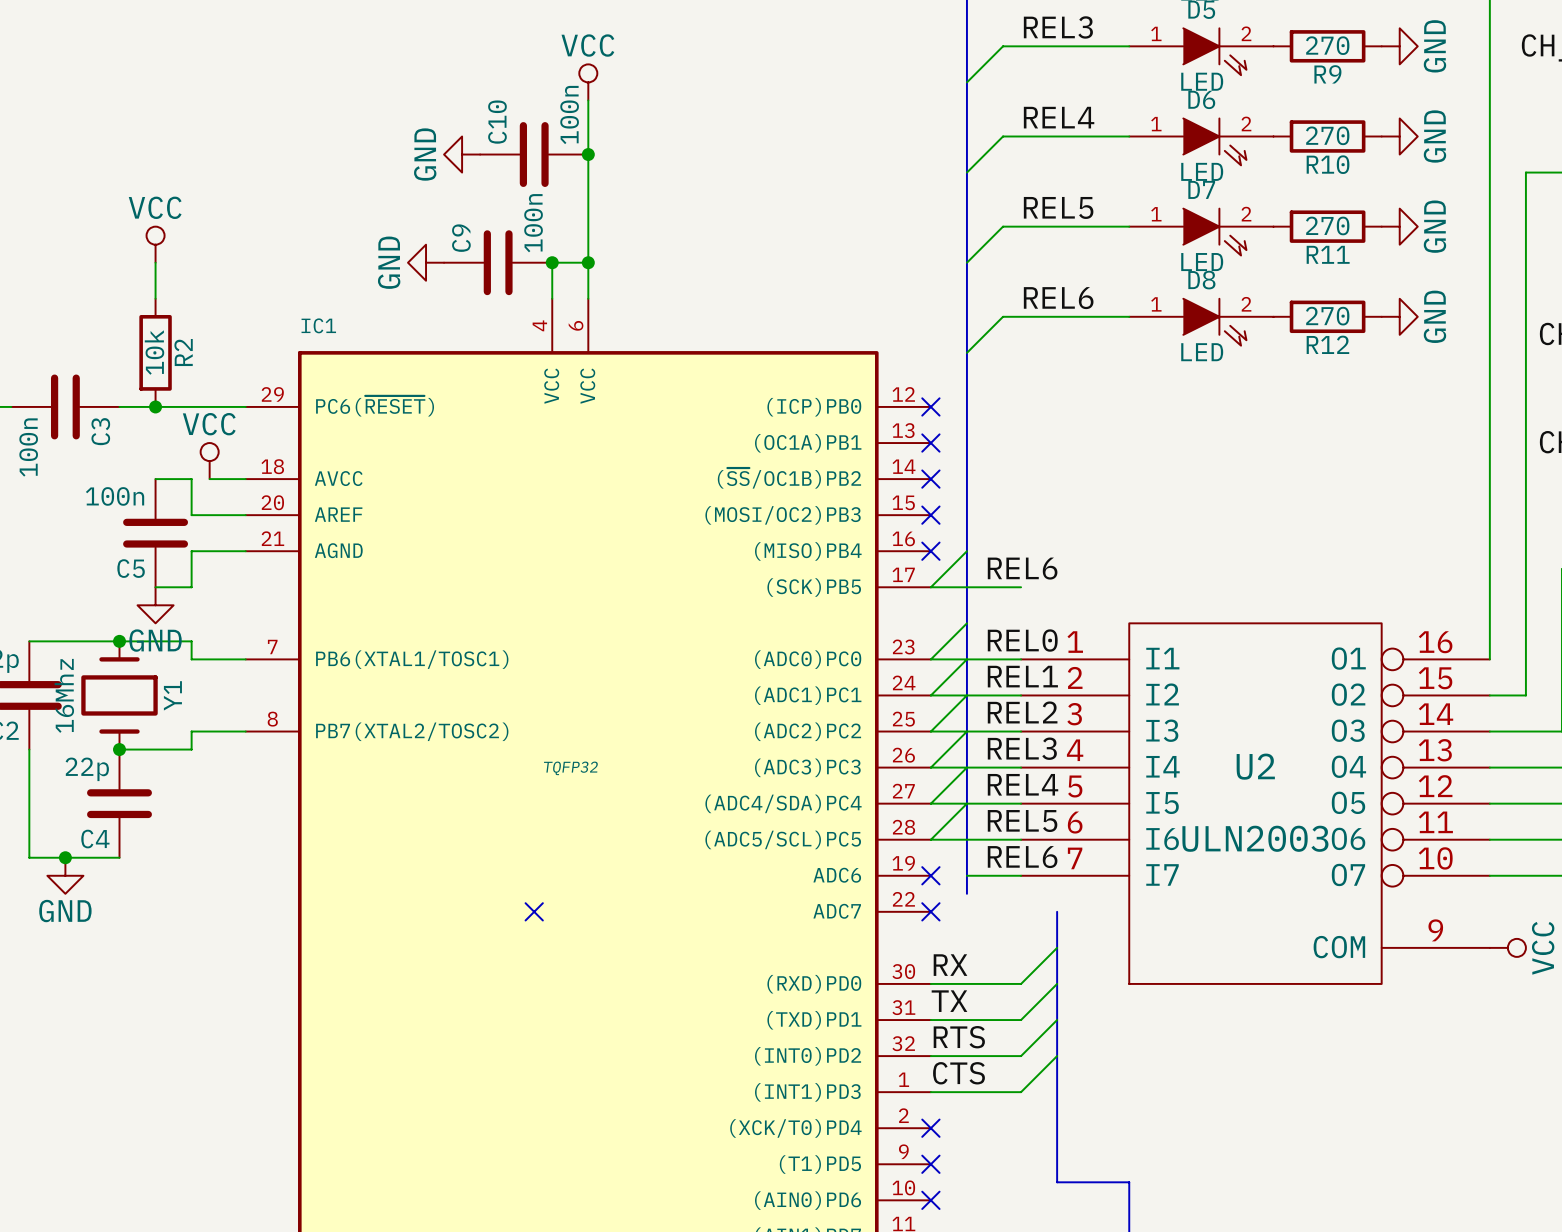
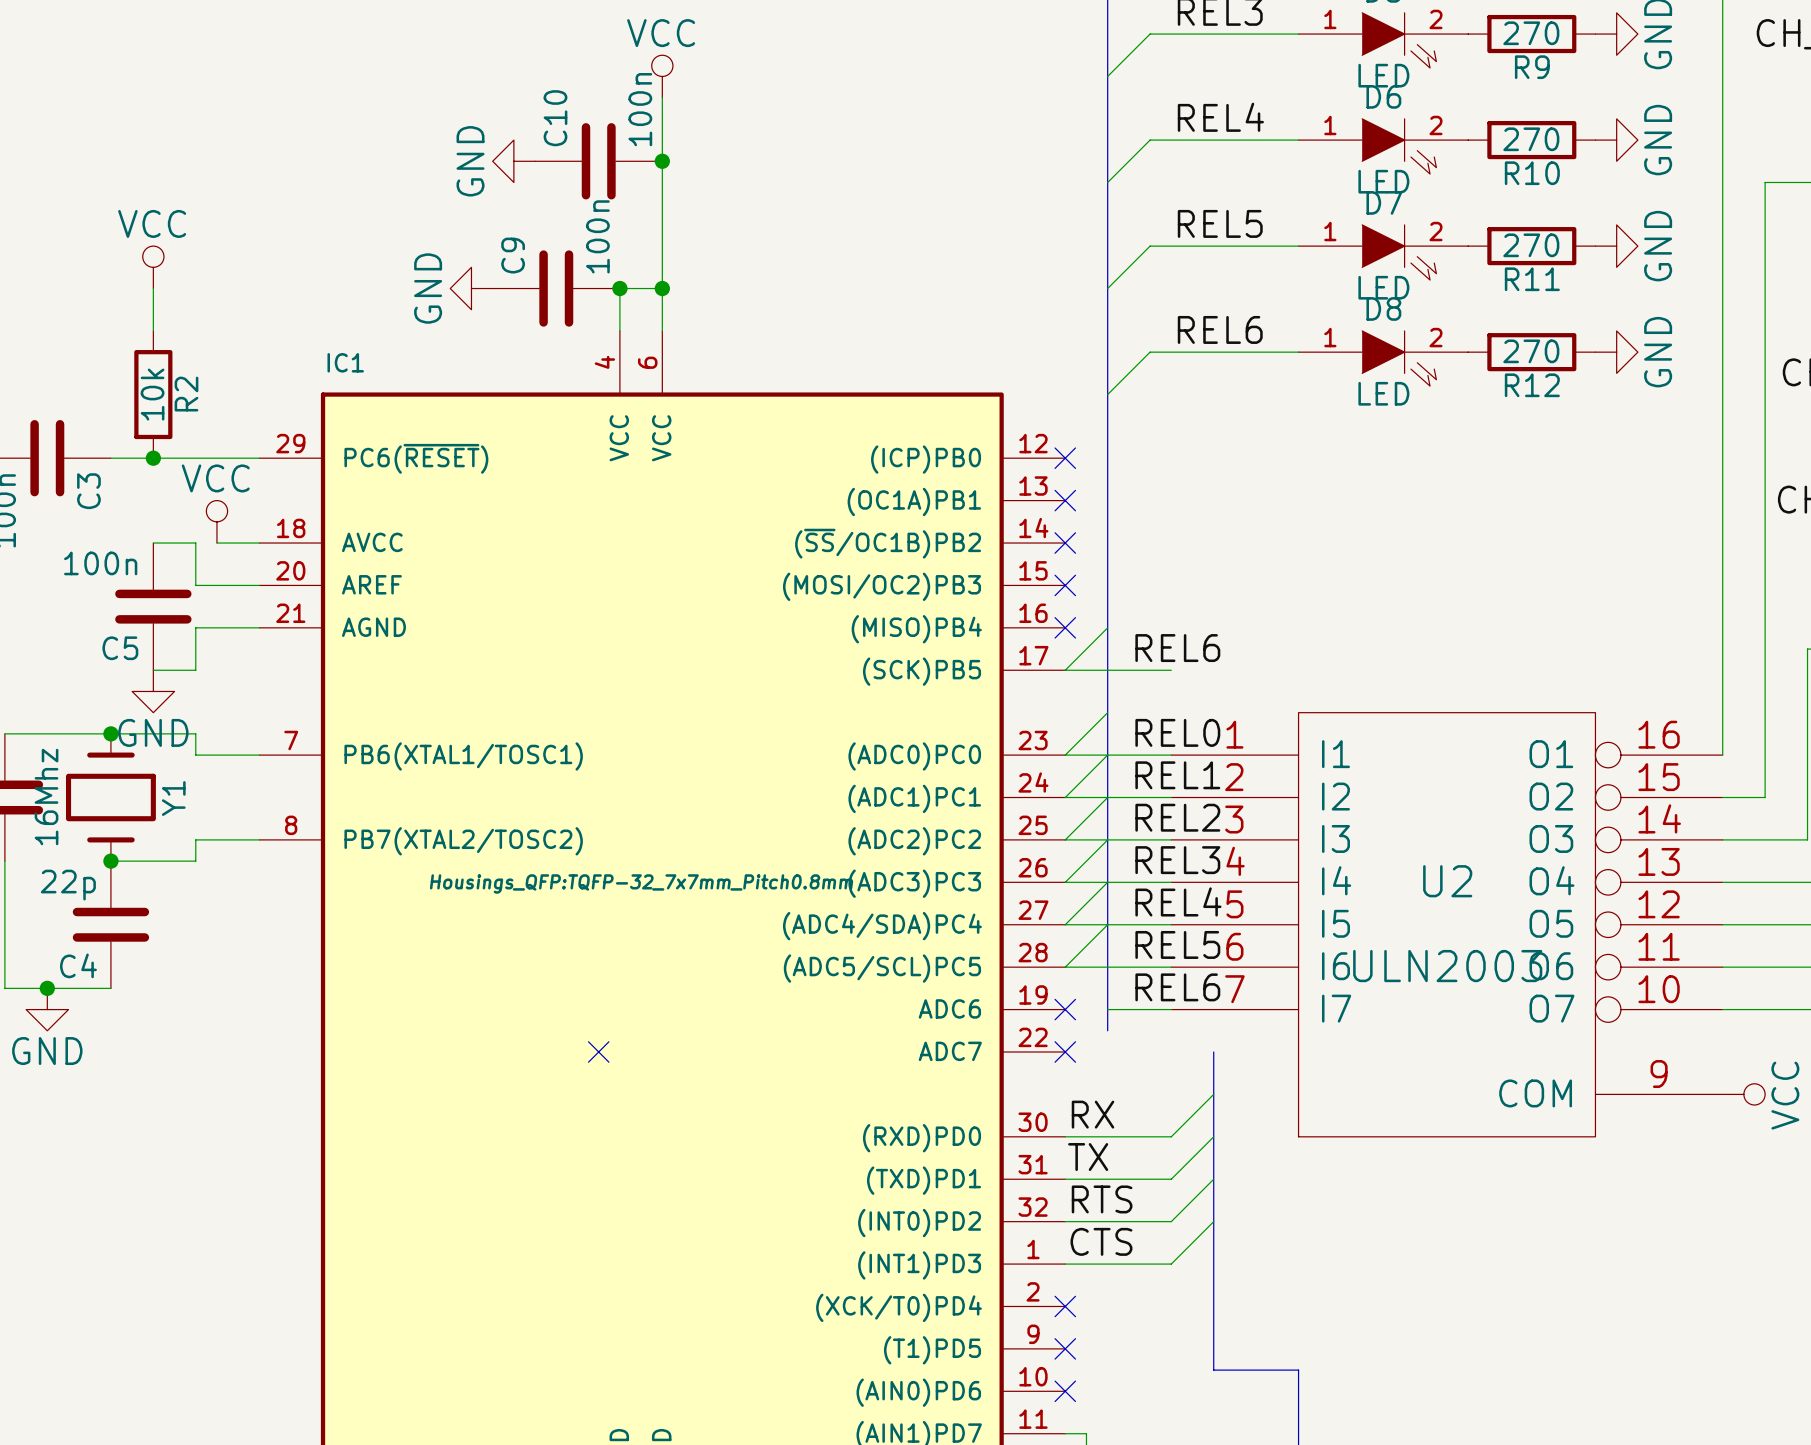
IC1 text: TQFP32 (570, 768) -> Housings_QFP:TQFP-32_7x7mm_Pitch0.8mm (641, 883)

